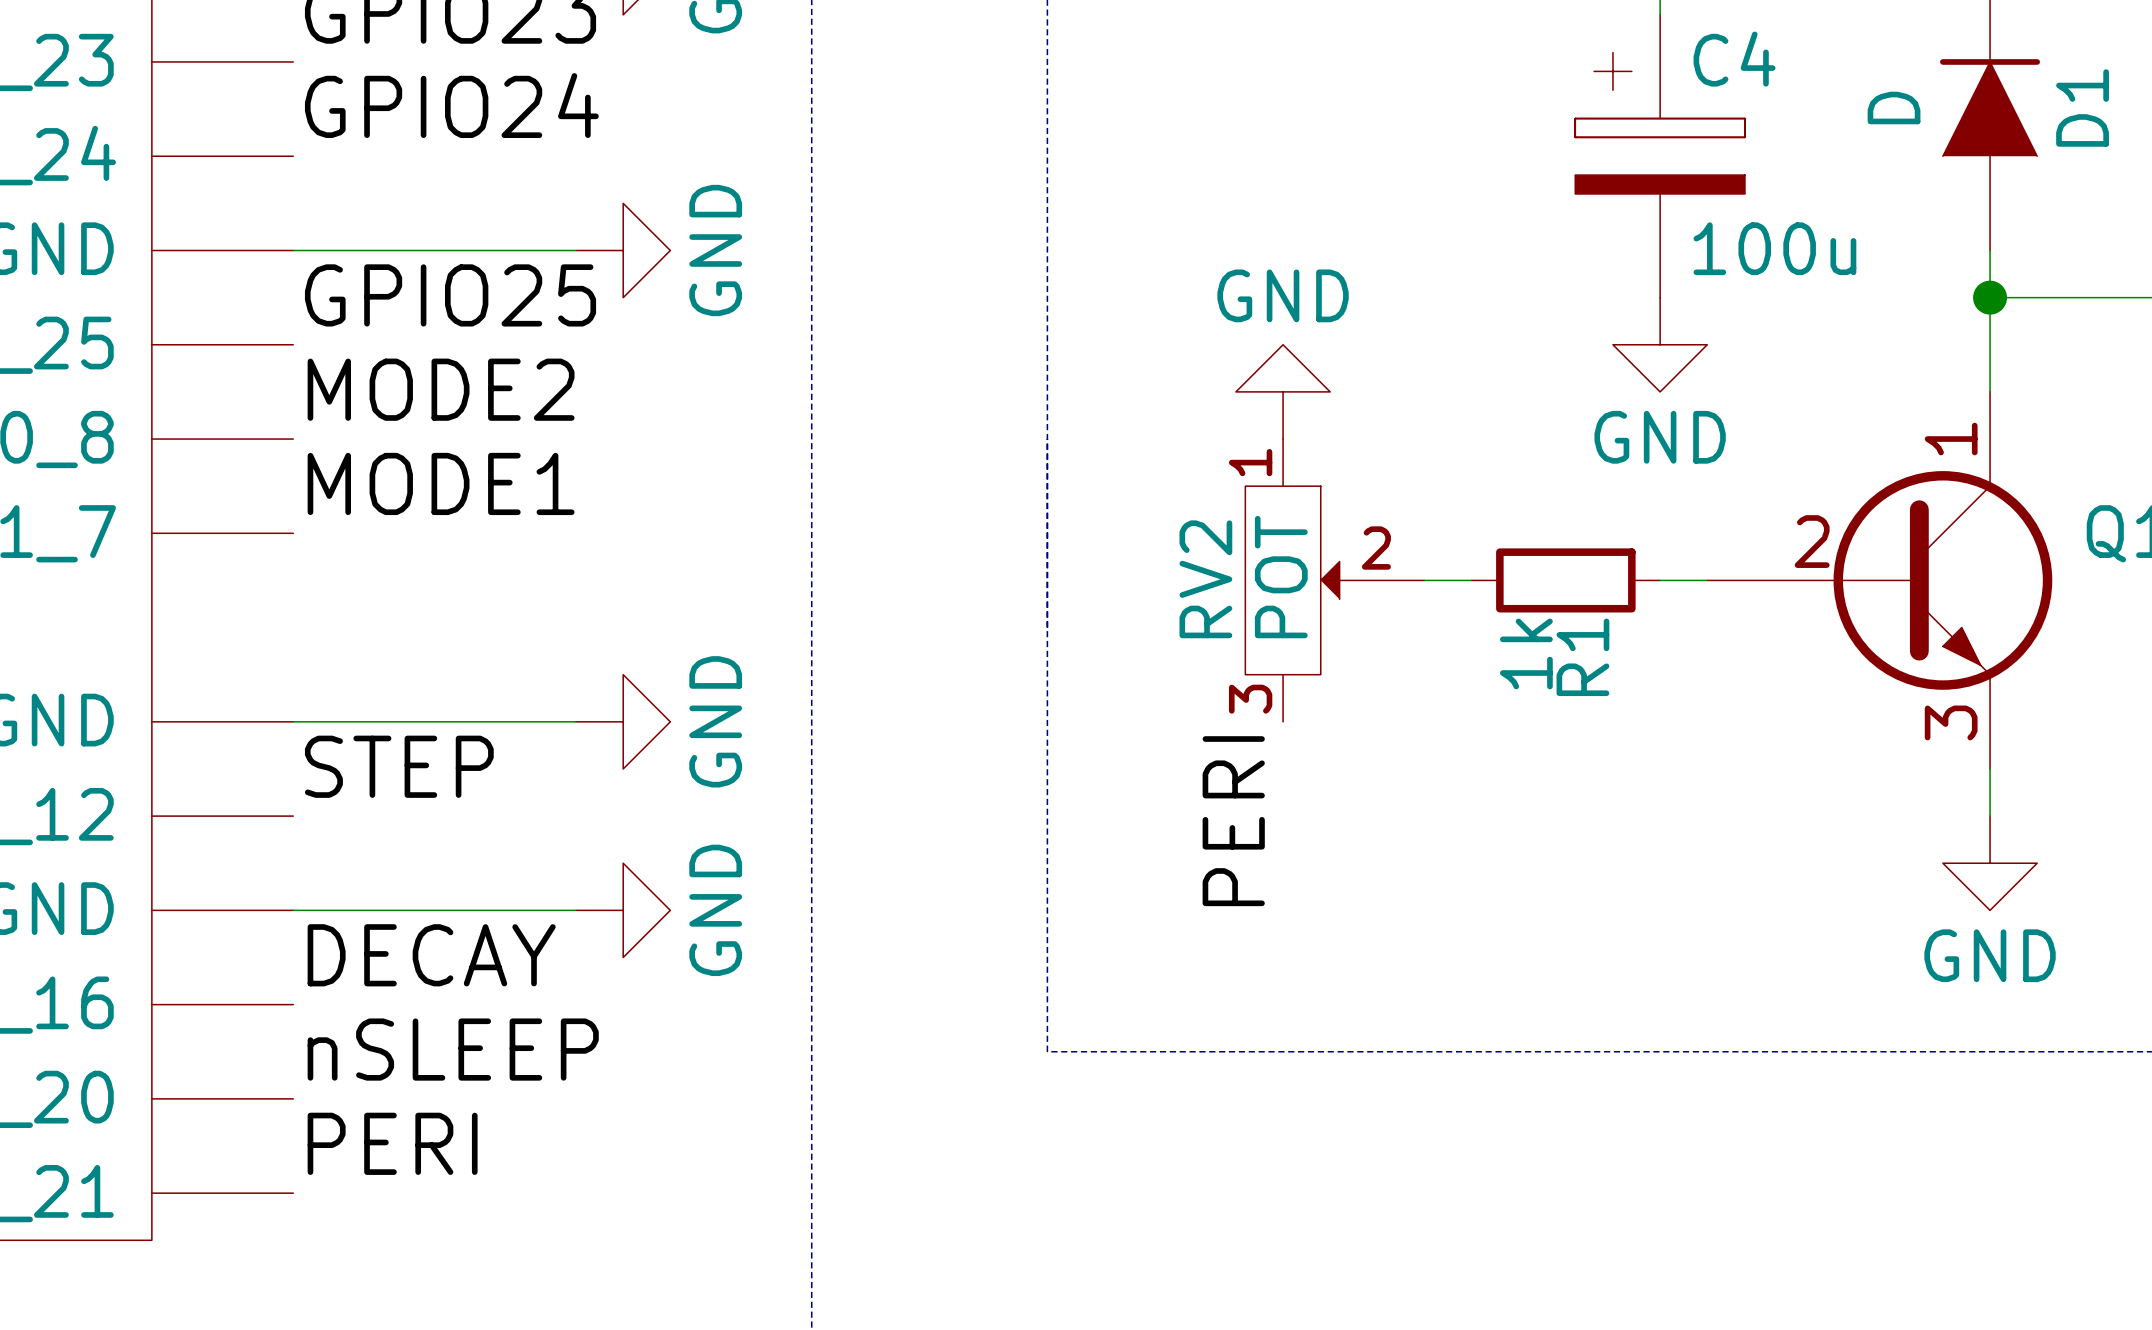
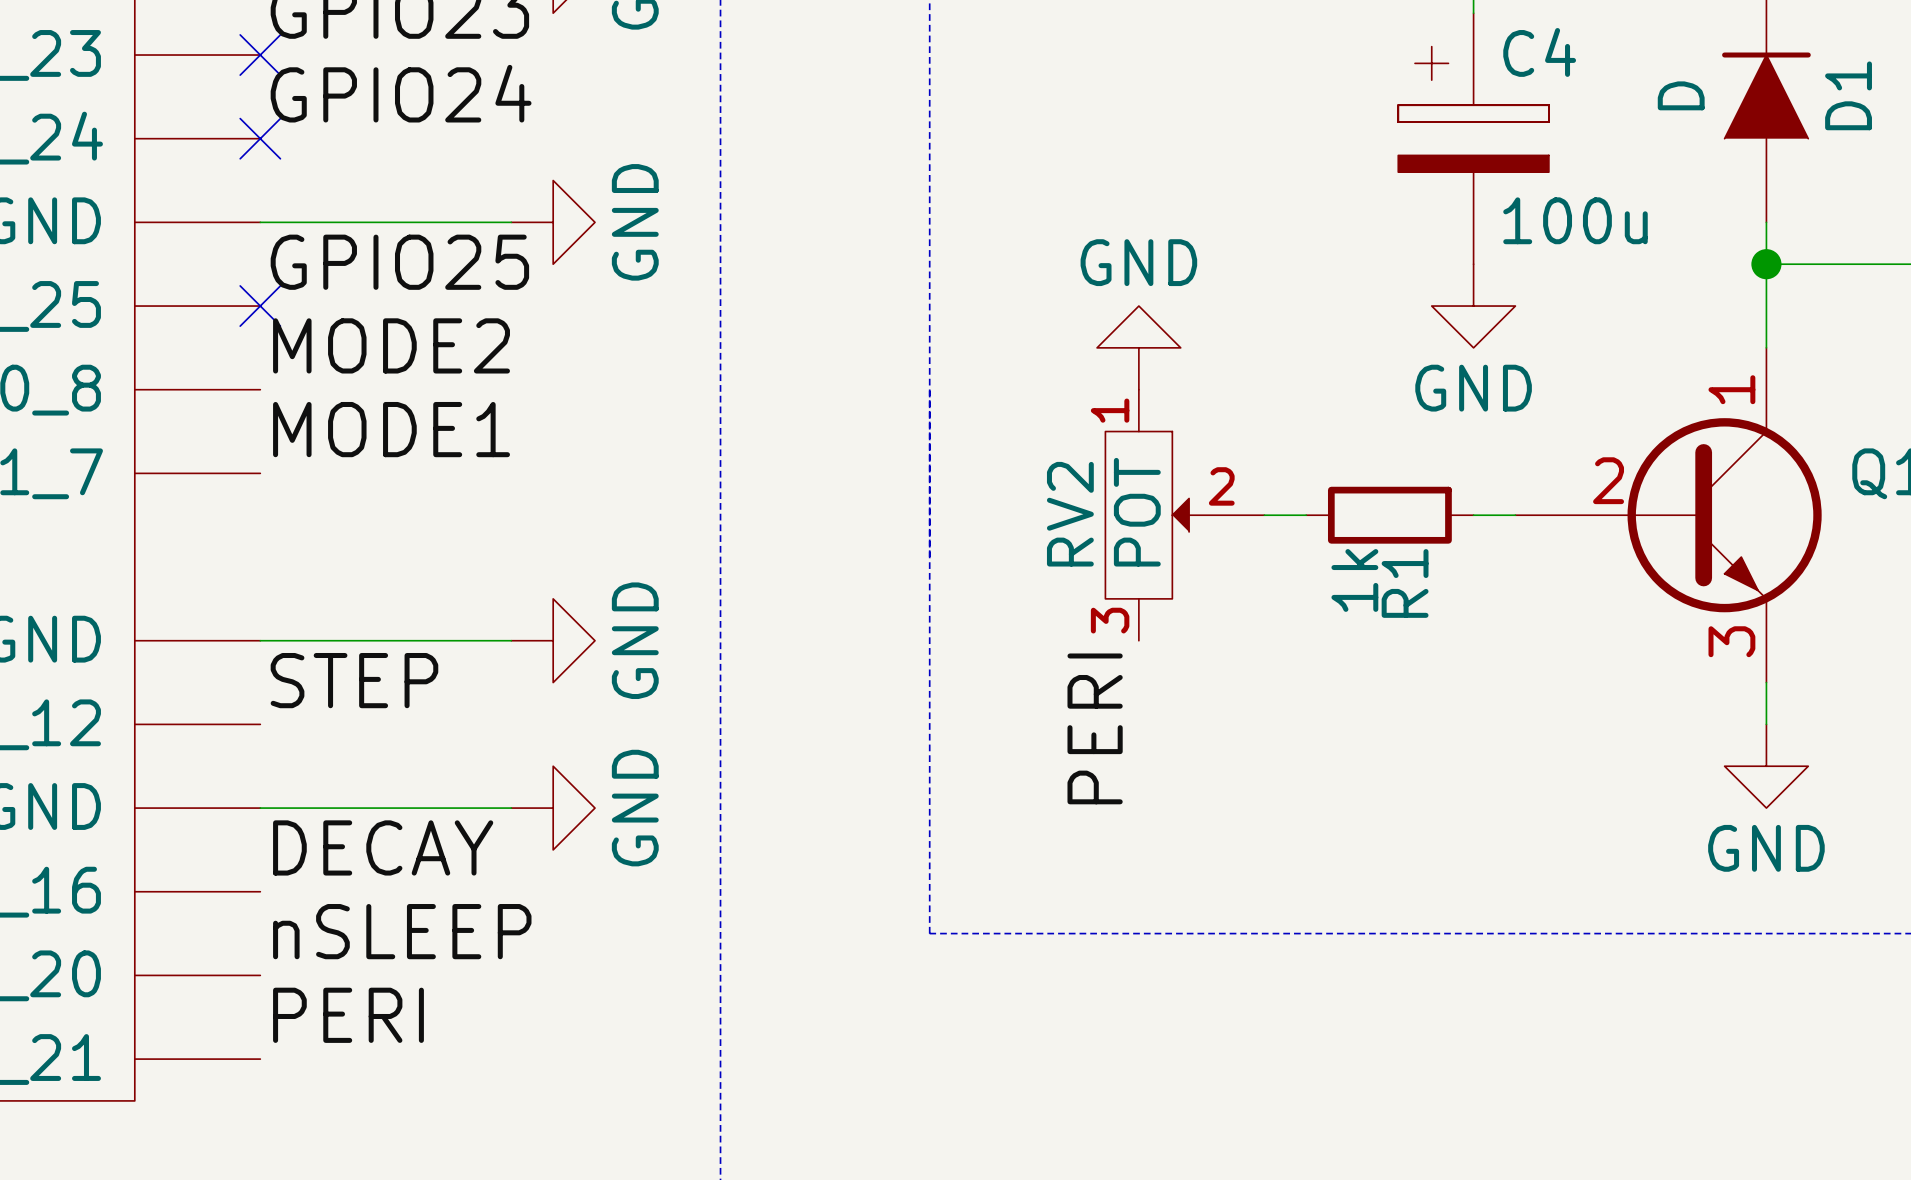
no-connect mark: none -> (260, 55)
no-connect mark: none -> (260, 138)
no-connect mark: none -> (260, 306)

